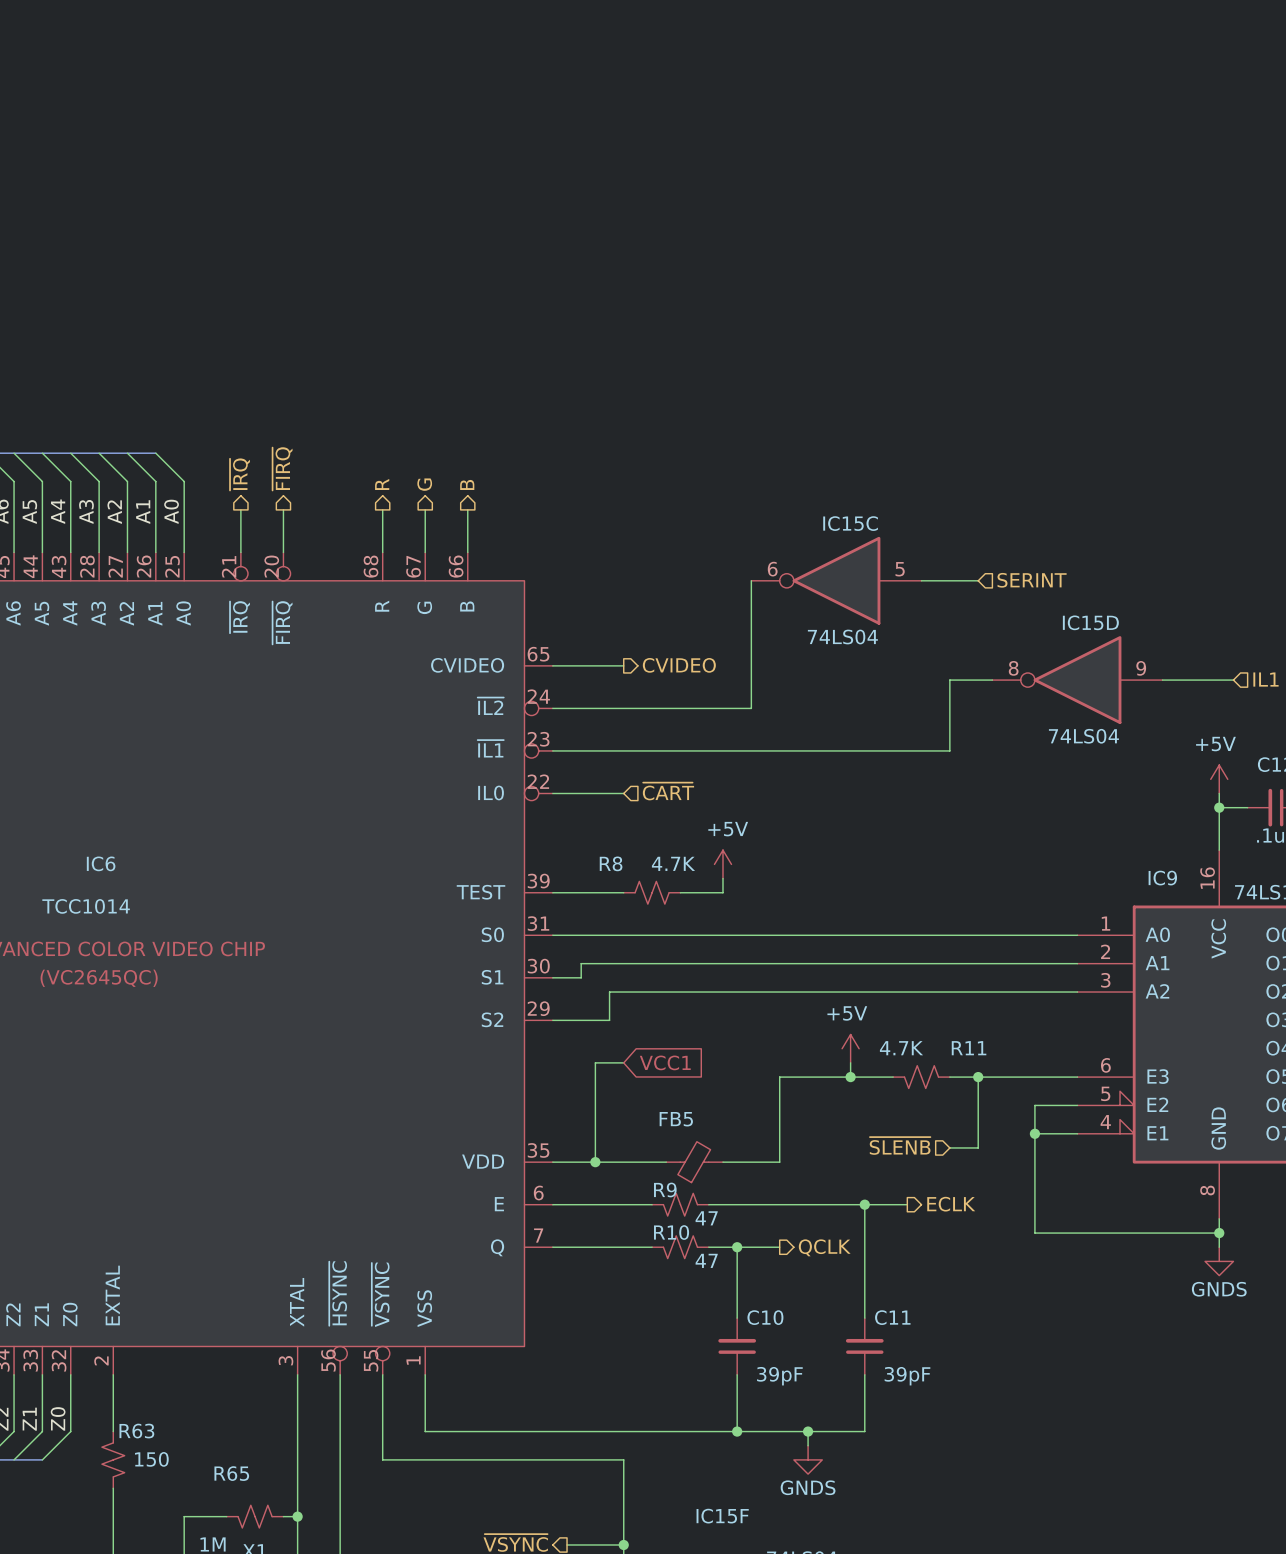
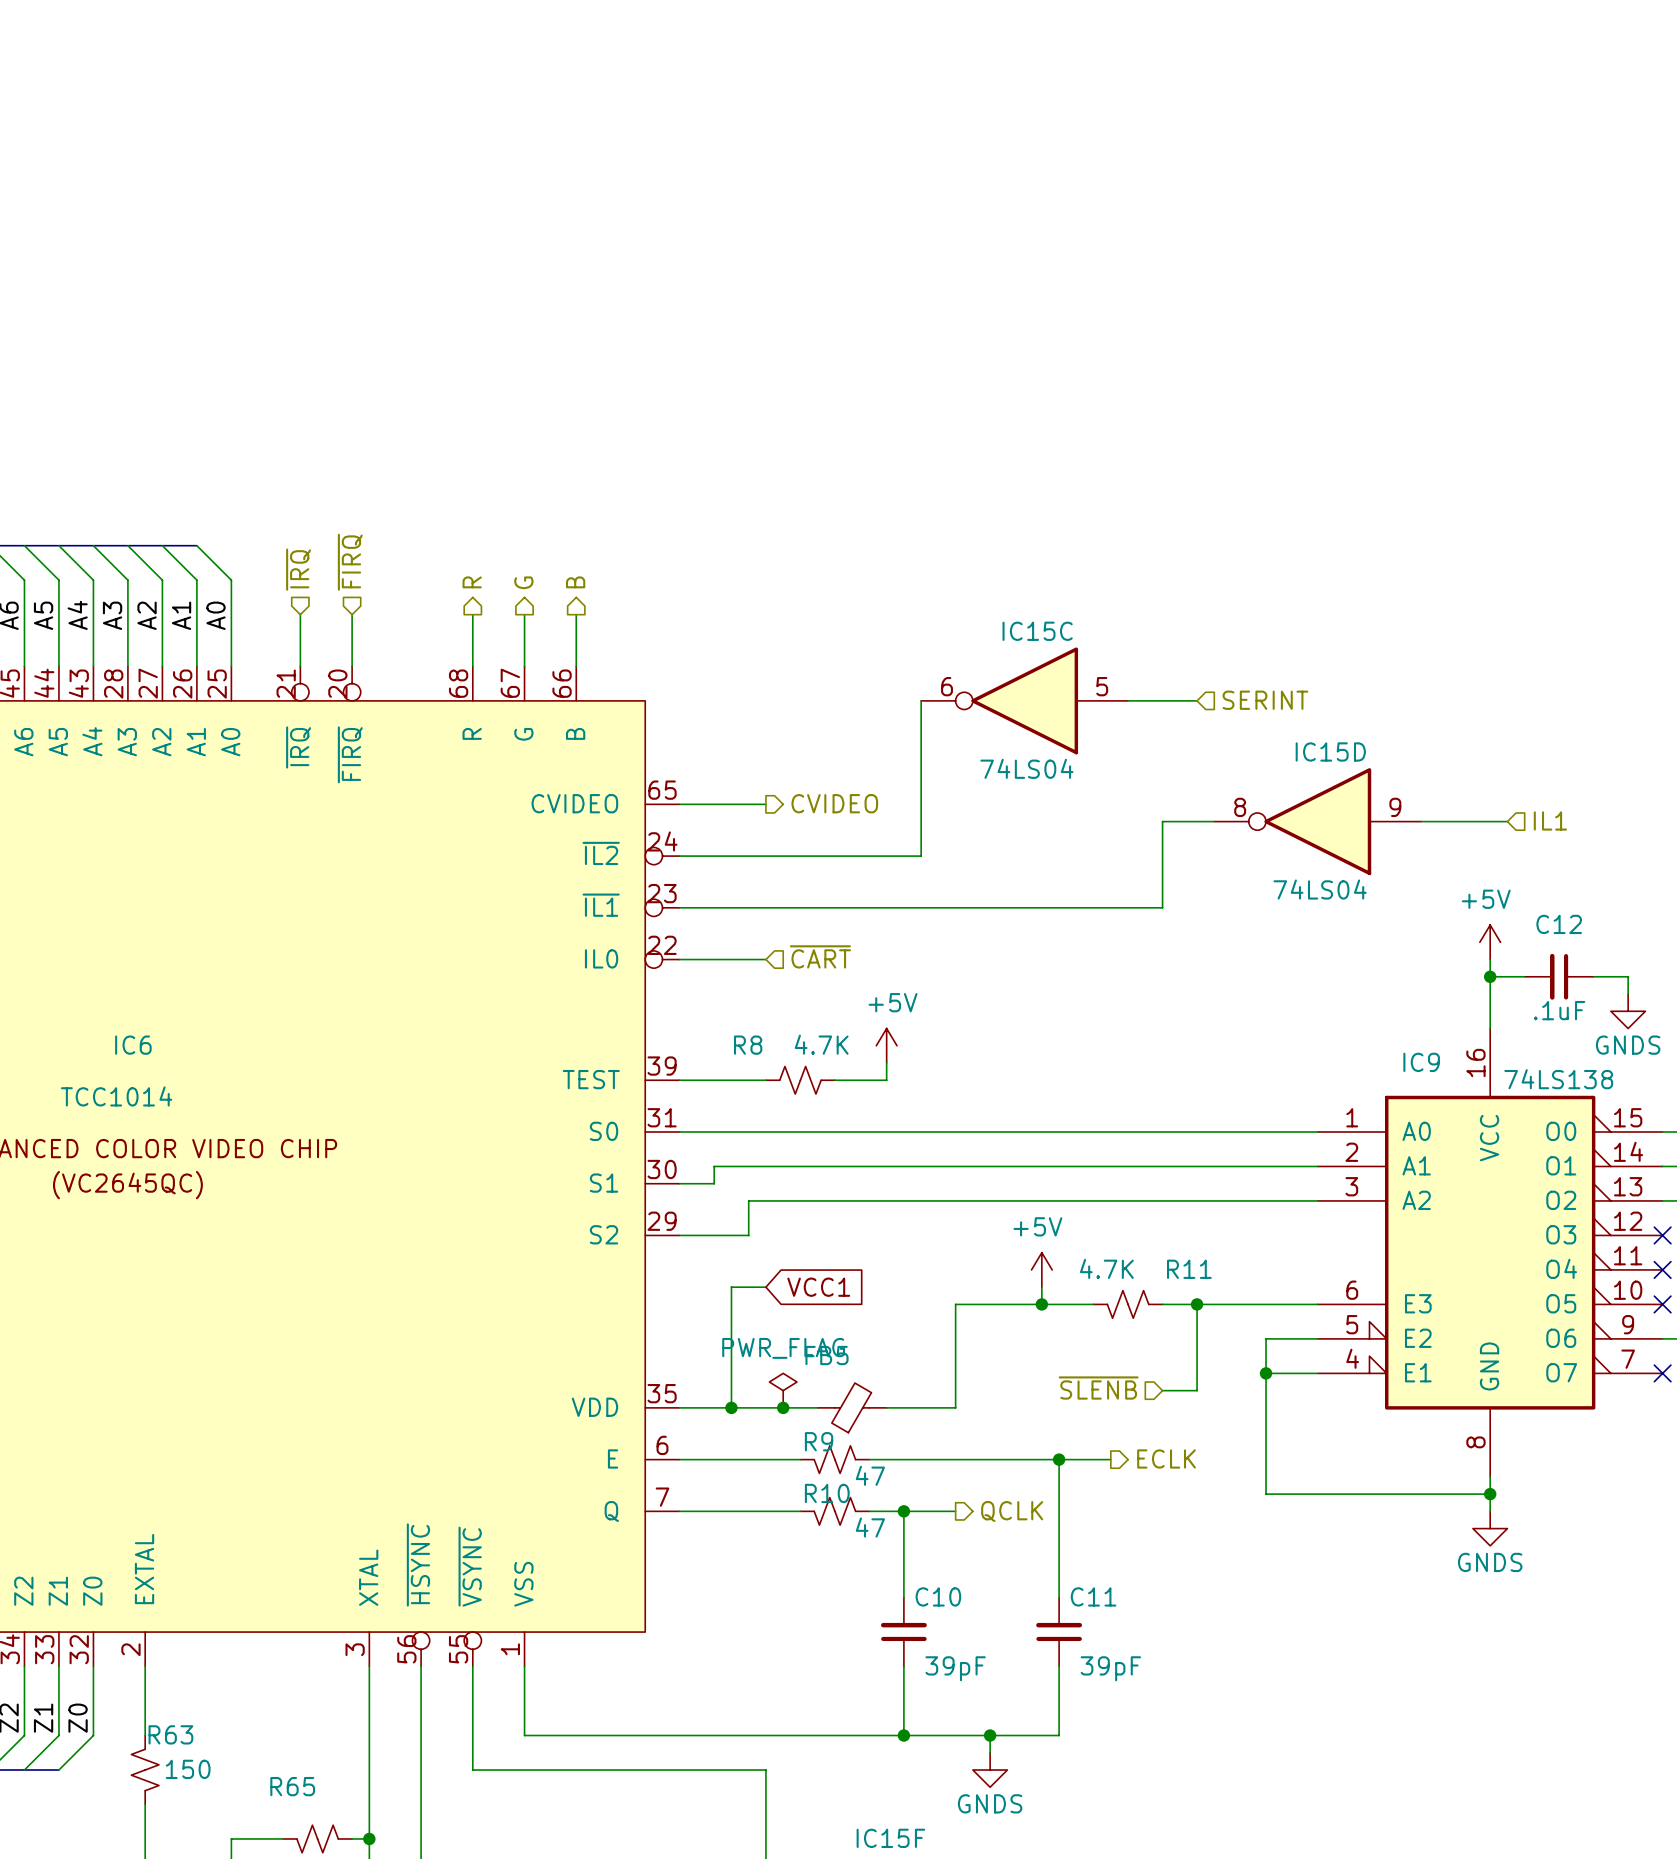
hierarchical label shape: output (282, 468) -> input (350, 562)
hierarchical label shape: output (239, 474) -> input (298, 569)
power symbol: none -> PWR_FLAG (783, 1390)
junction: none -> (783, 1407)

